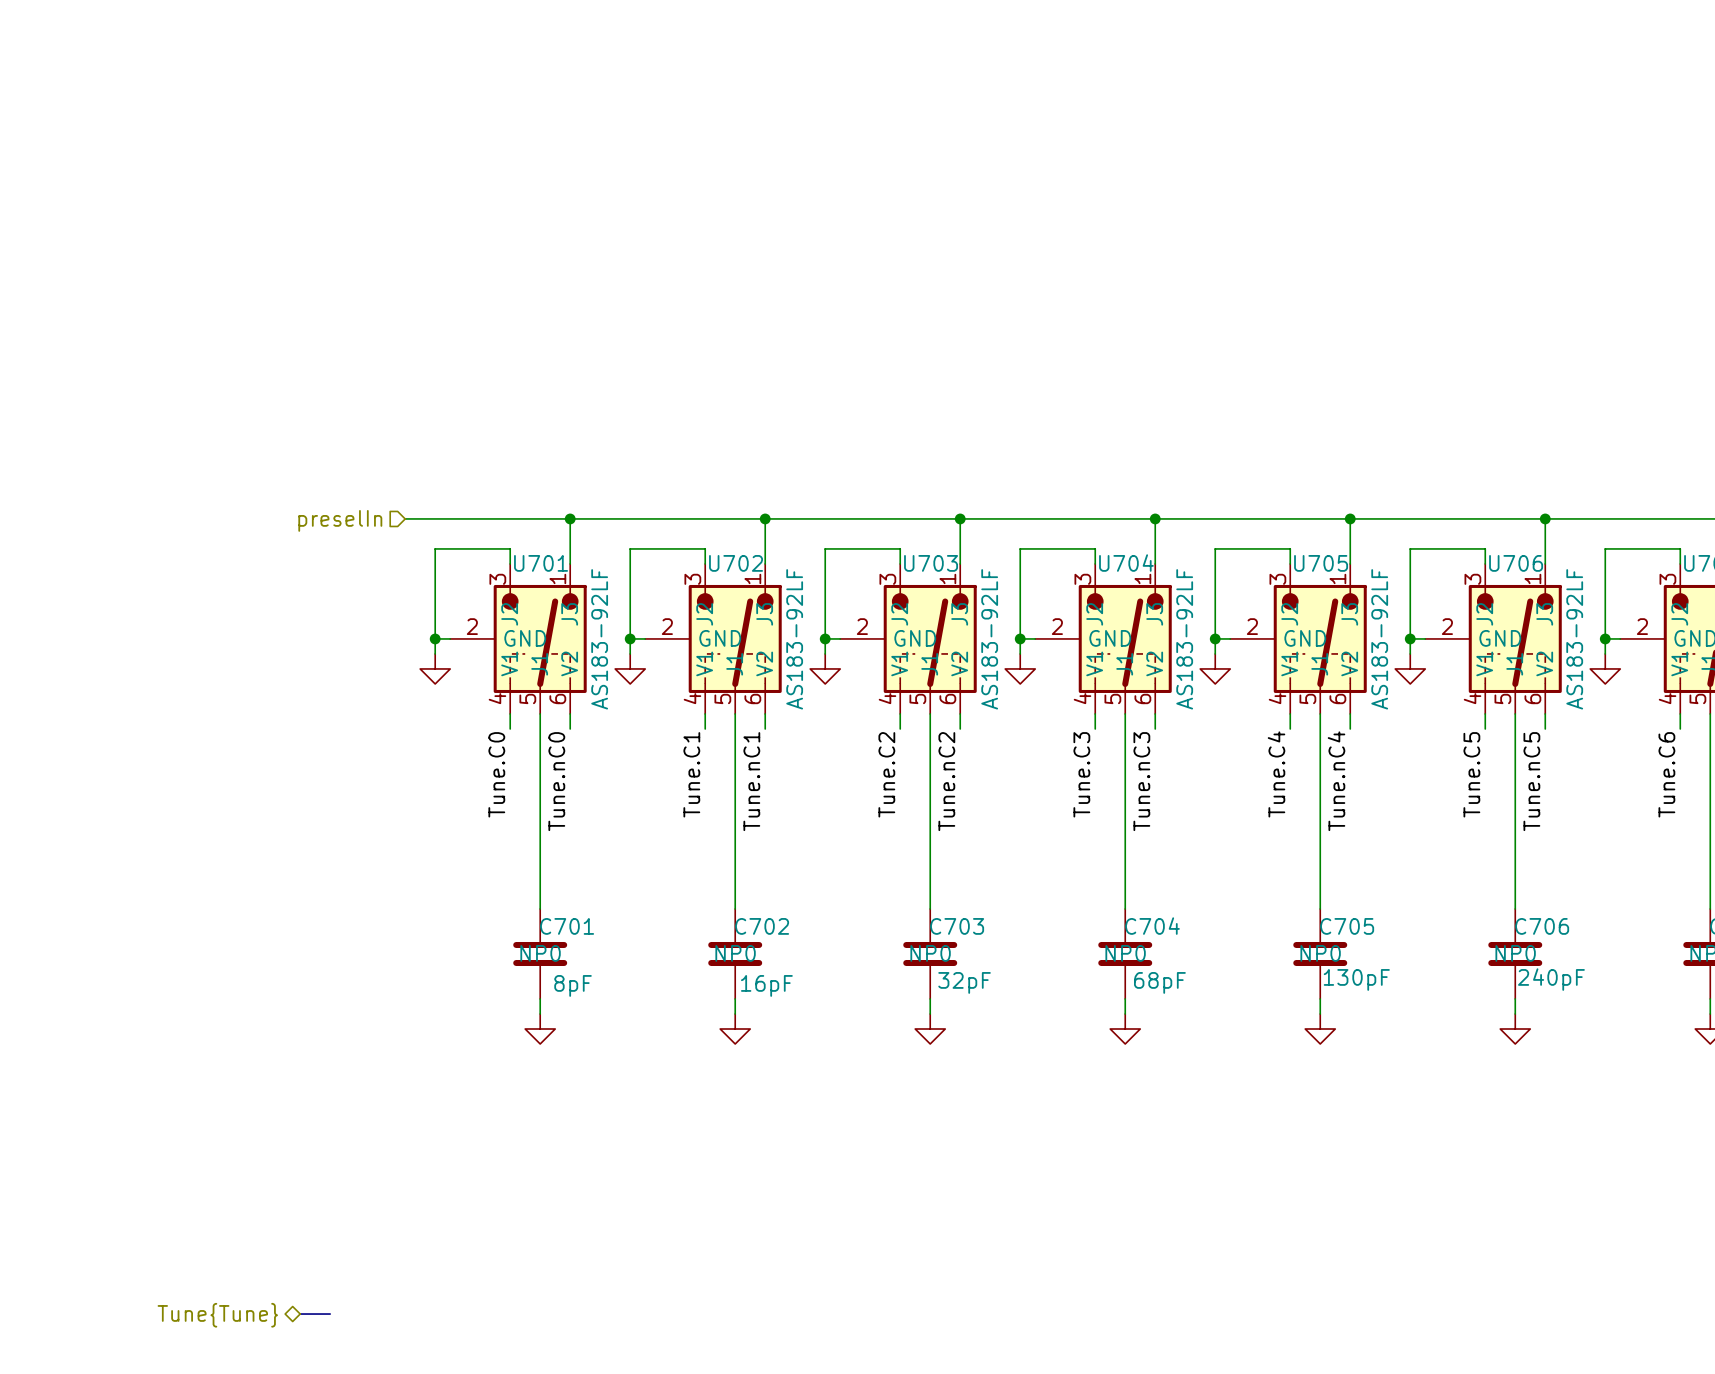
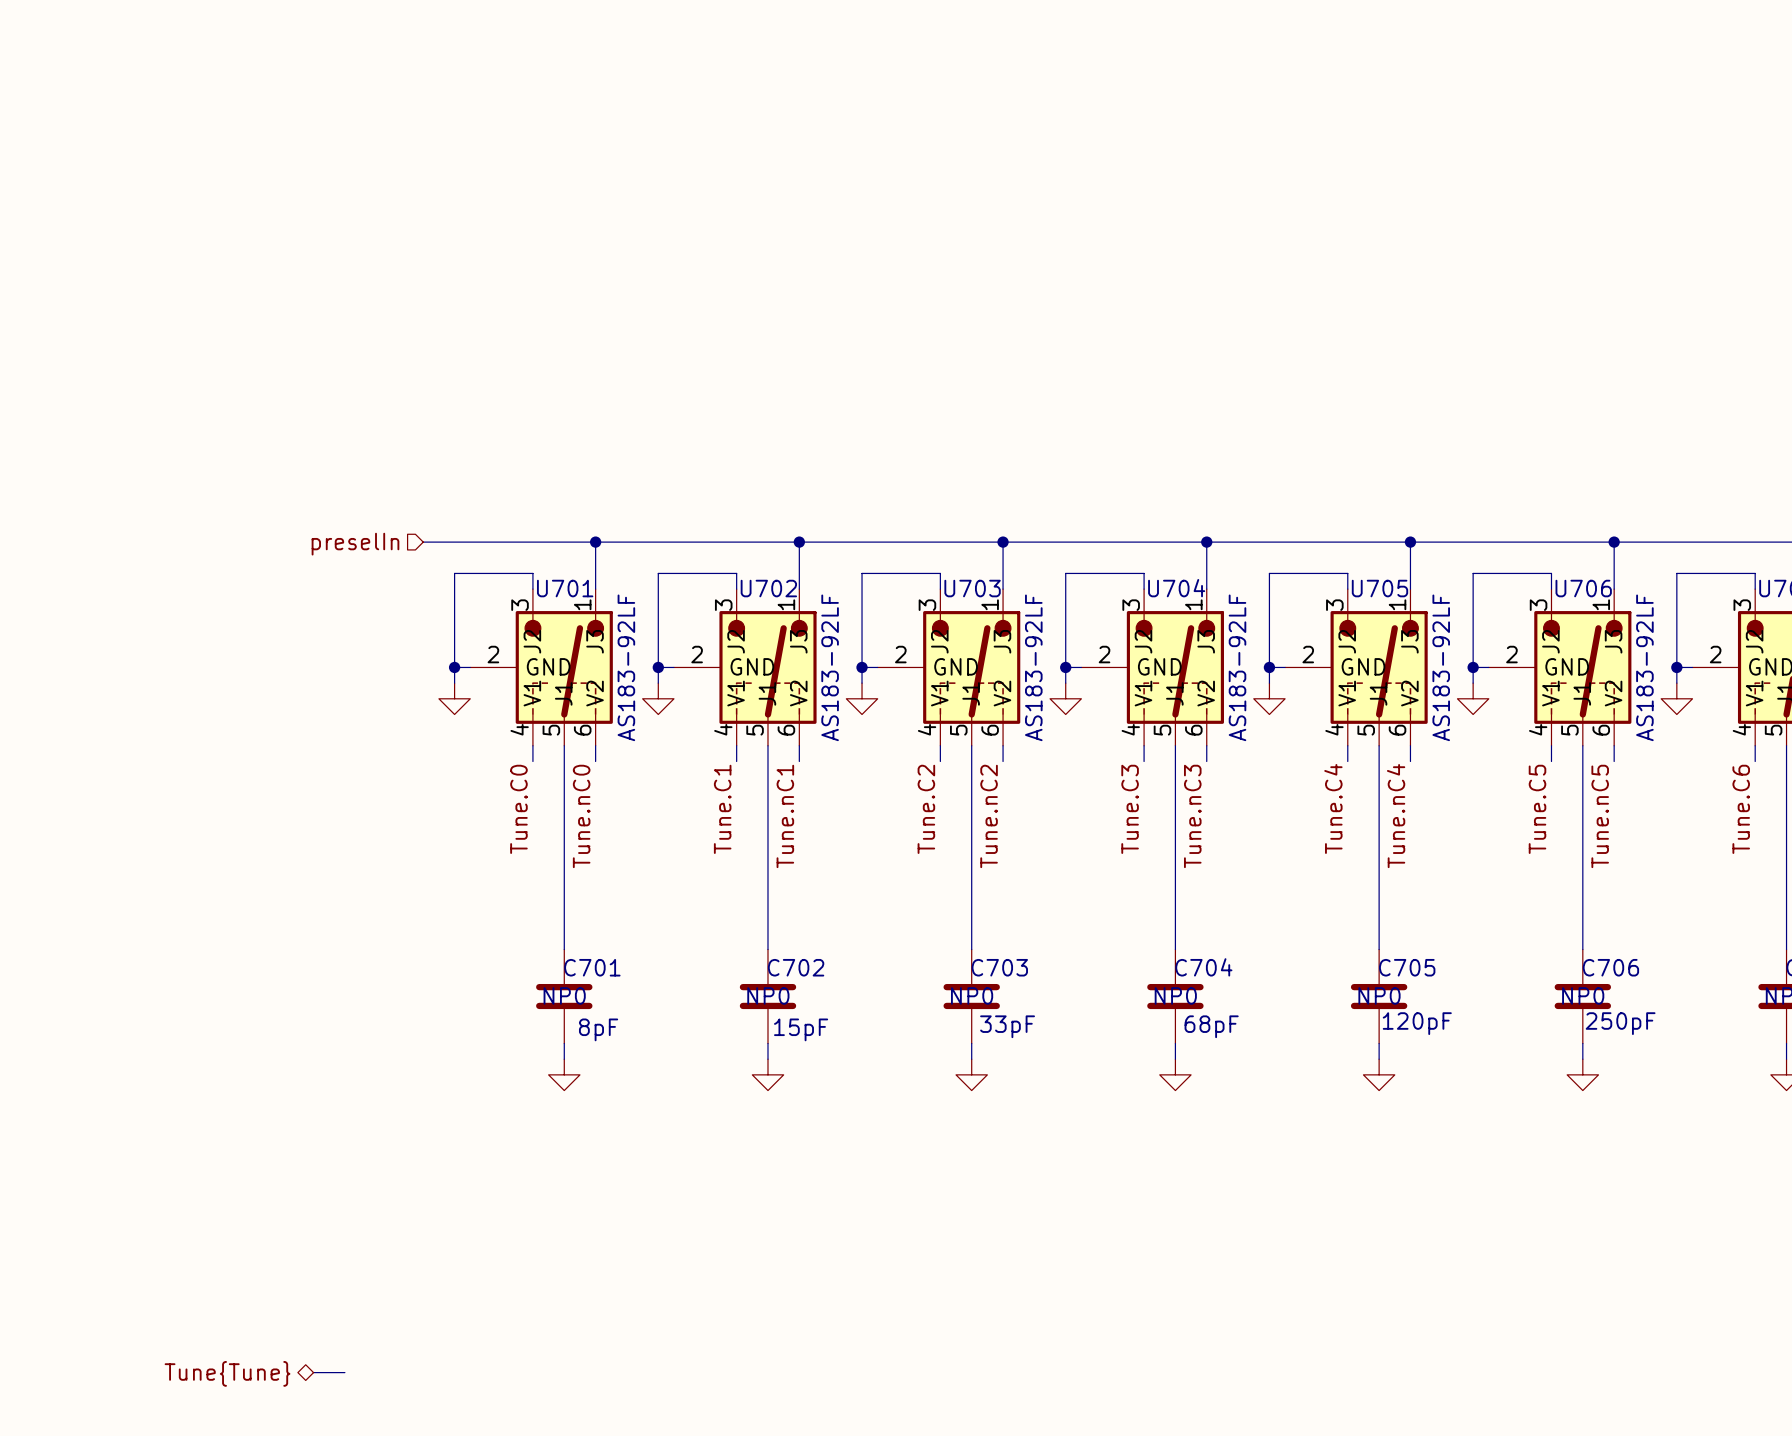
C705 value: 130pF (1356, 979) -> 120pF (1417, 1023)
C706 value: 240pF (1551, 979) -> 250pF (1620, 1023)
C703 value: 32pF (964, 982) -> 33pF (1007, 1026)
C702 value: 16pF (766, 985) -> 15pF (801, 1029)

